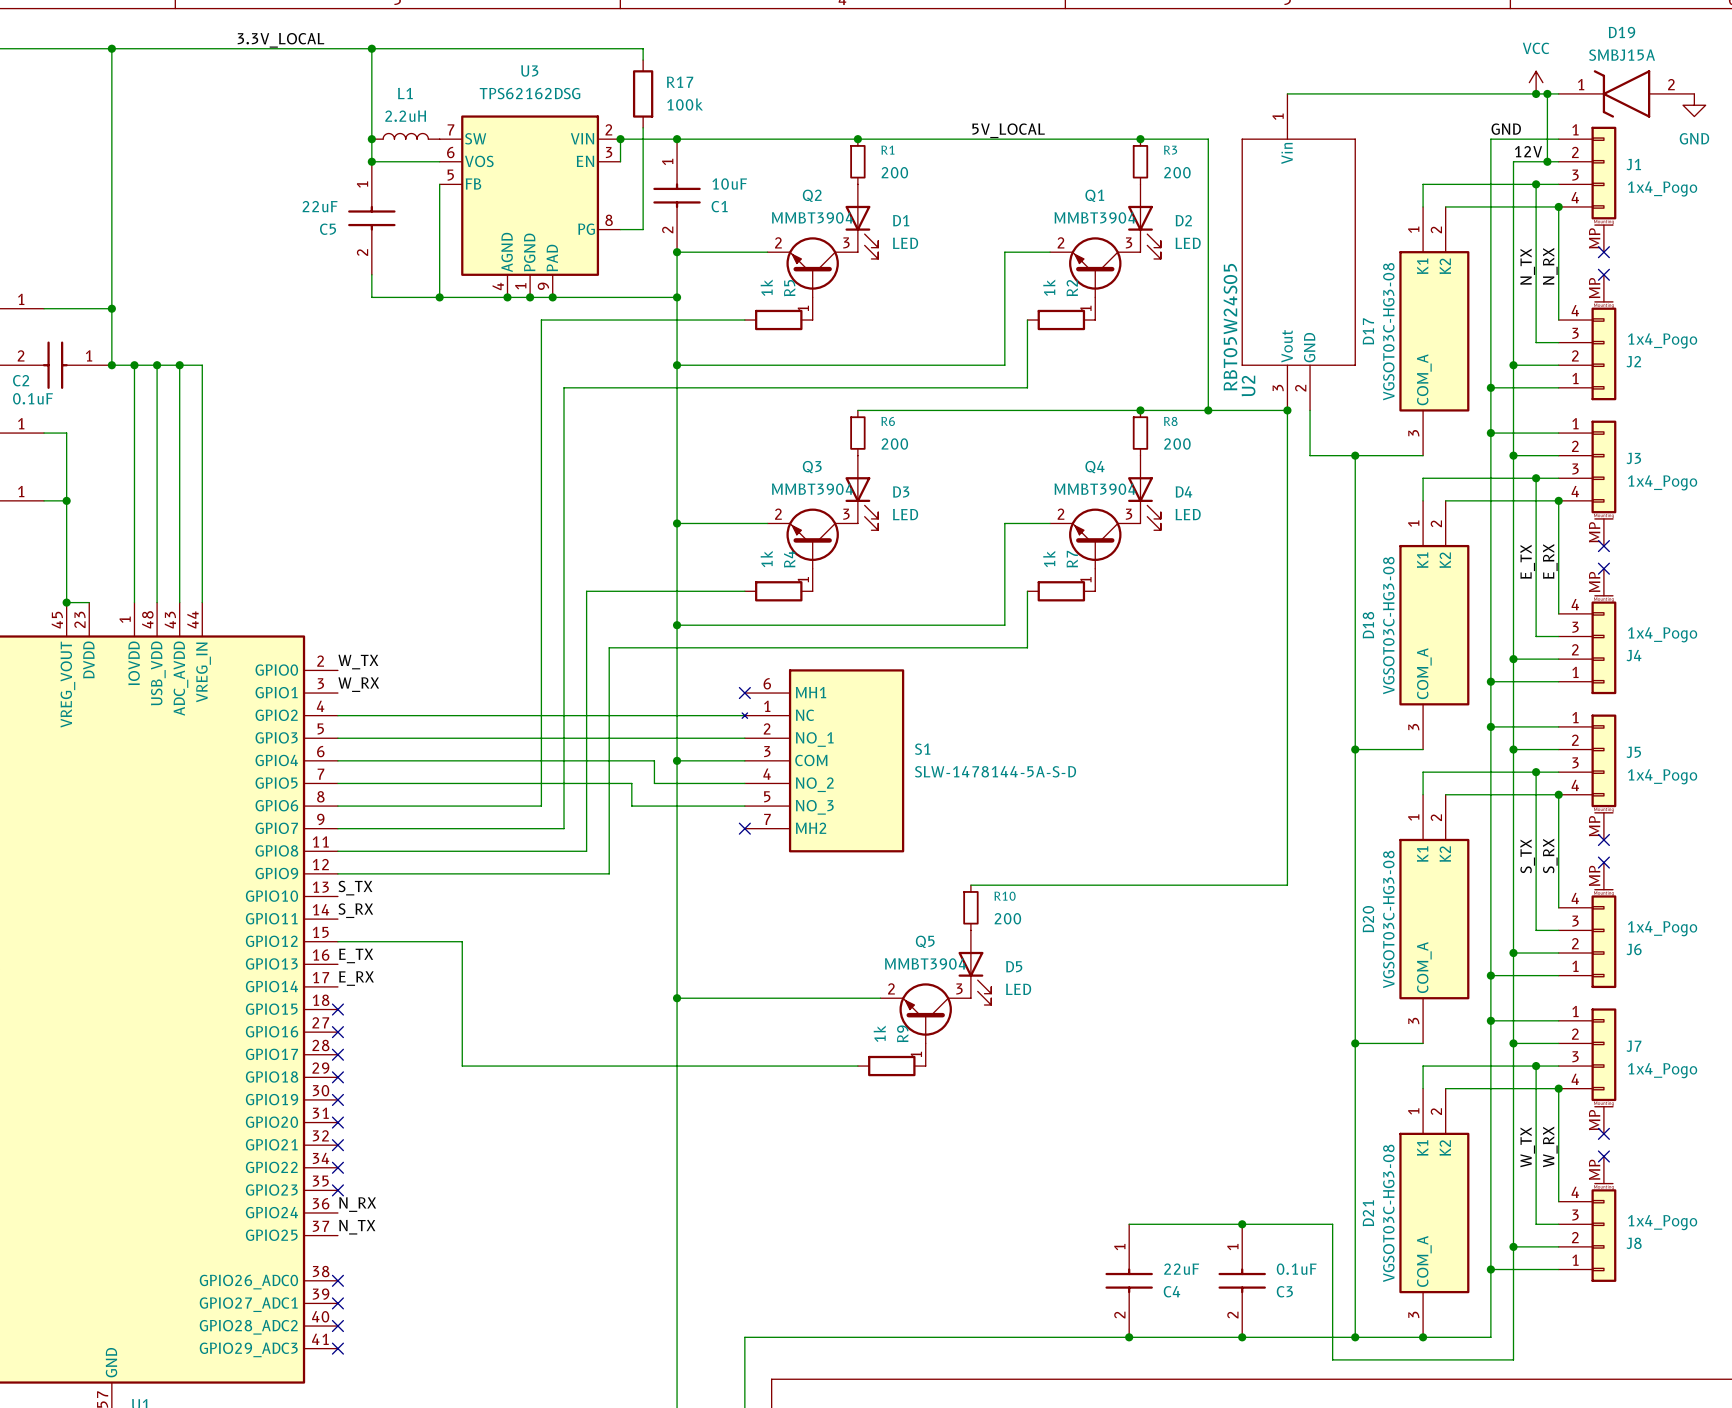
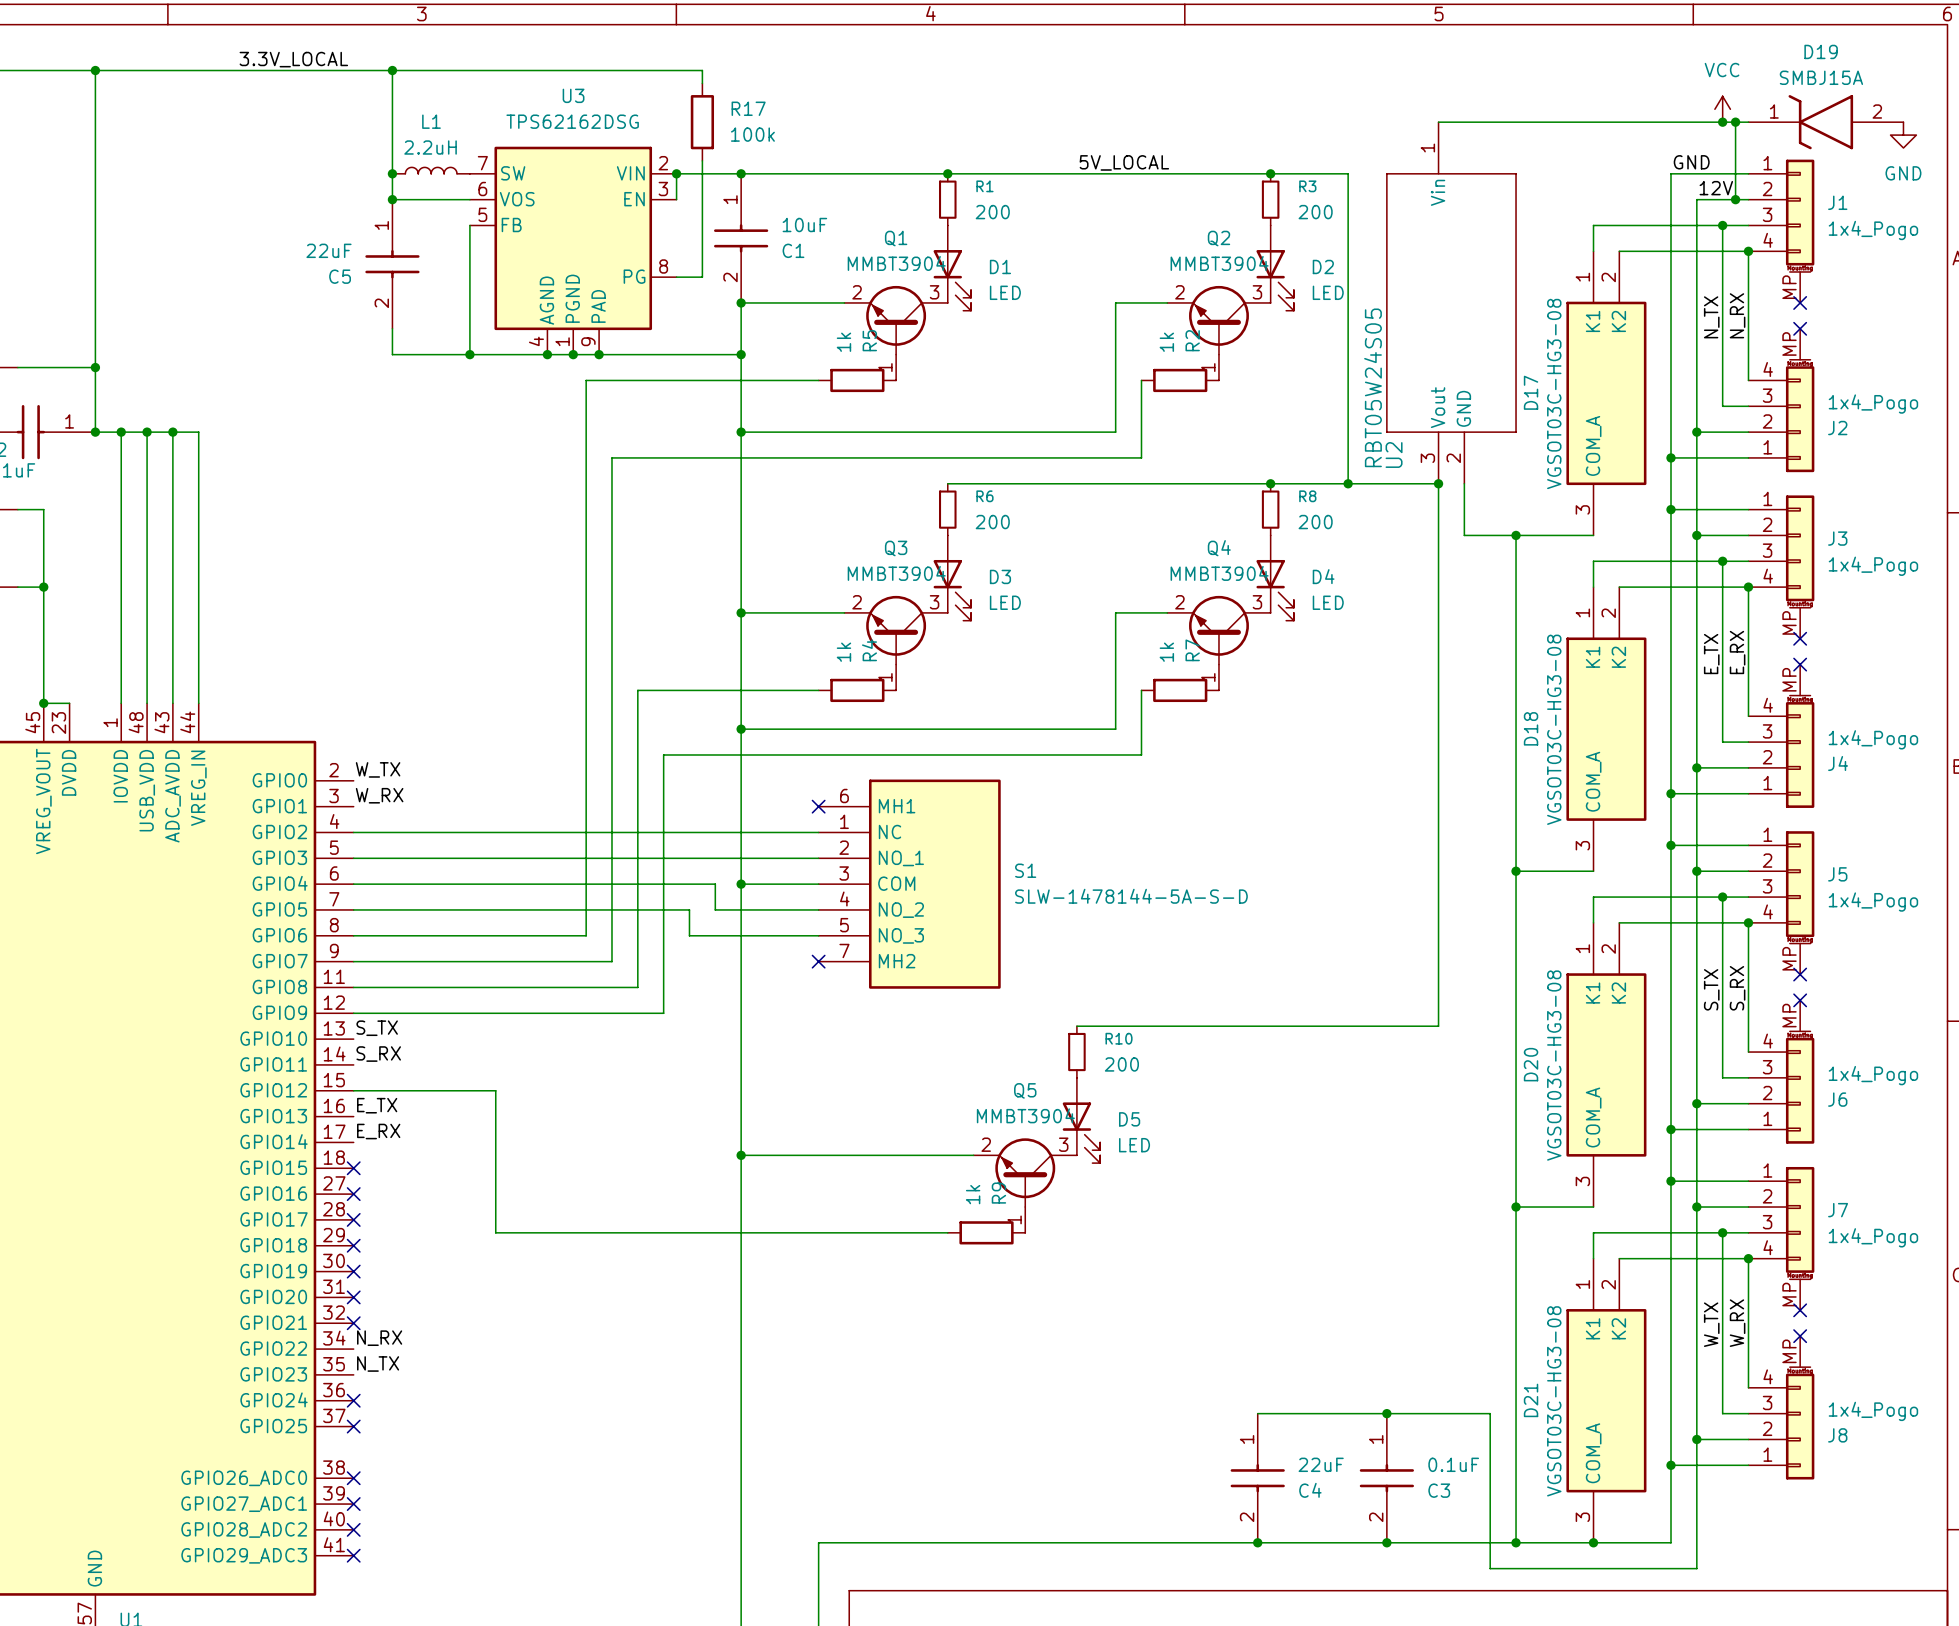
Q2 name: Q2 (812, 195) -> Q1 (896, 238)
Q1 name: Q1 (1094, 195) -> Q2 (1218, 238)
S1 symbol: [742, 669, 905, 853] -> [818, 779, 1001, 989]
no-connect mark: (337, 1167) -> none
no-connect mark: (337, 1190) -> none
label position: N_RX (357, 1204) -> N_RX (379, 1338)
no-connect mark: none -> (353, 1400)
label position: N_TX (357, 1227) -> N_TX (378, 1363)
no-connect mark: none -> (353, 1426)

